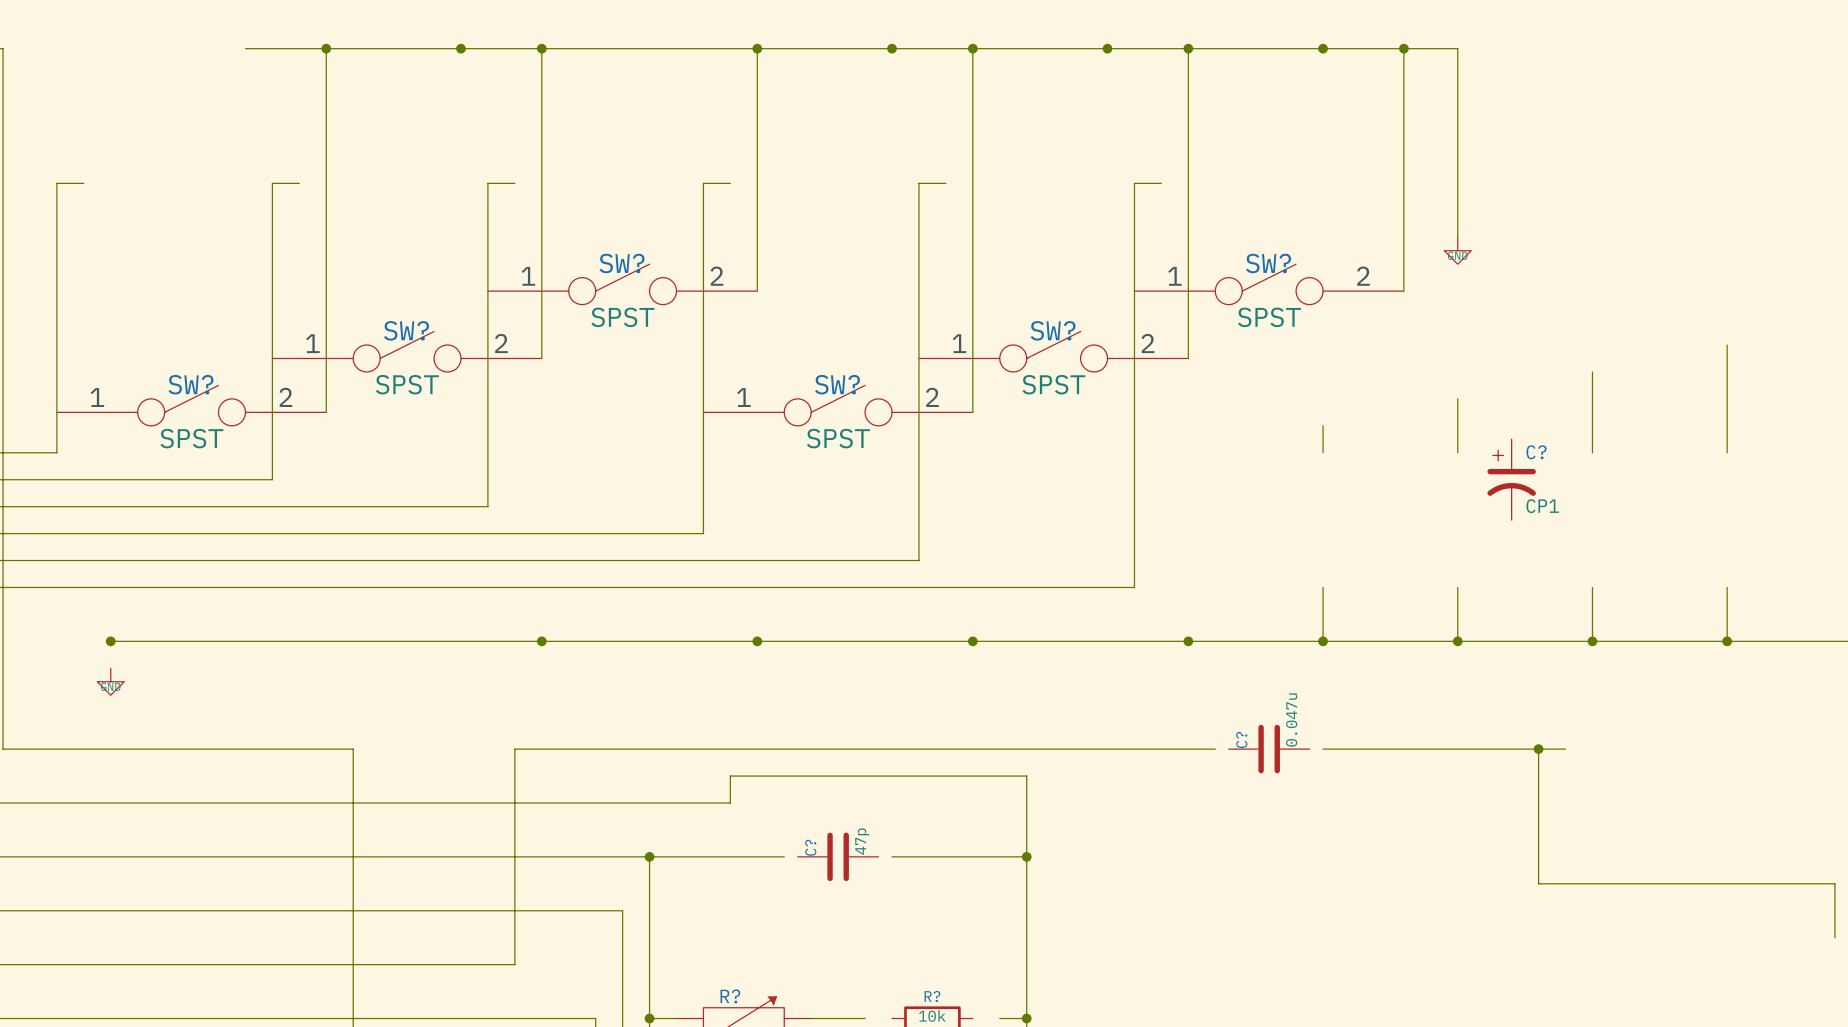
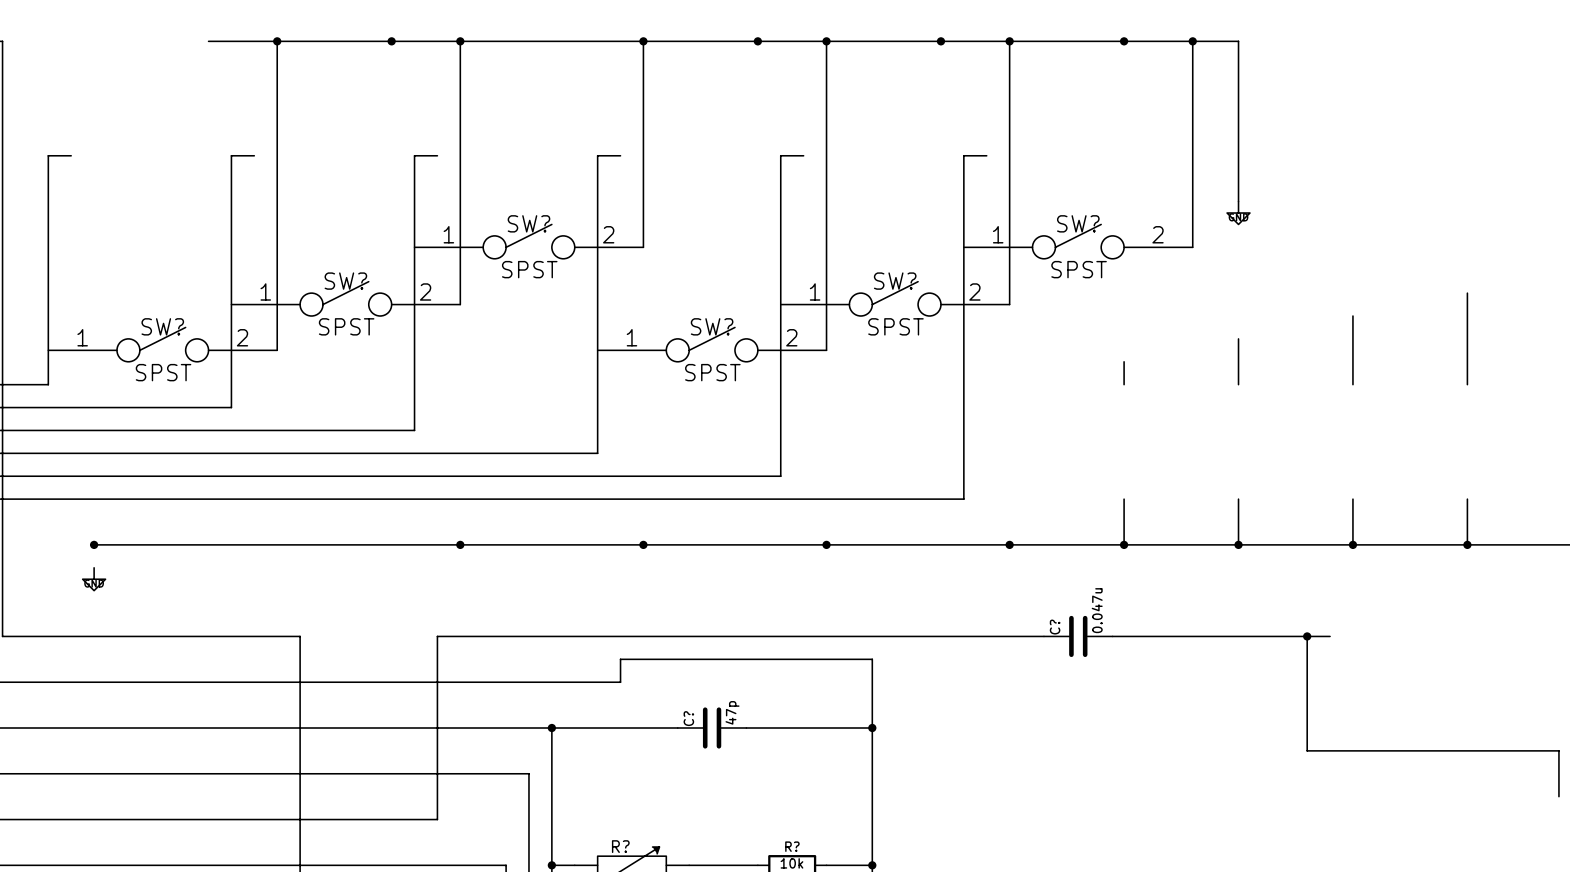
C?: CP1 (1511, 479) -> none
wire: none -> (1032, 636) (1043, 636)
wire: none -> (1112, 636) (1124, 636)
wire: none -> (666, 728) (677, 728)
wire: none -> (746, 728) (757, 728)
wire: none -> (734, 865) (757, 865)
wire: none -> (826, 865) (849, 865)

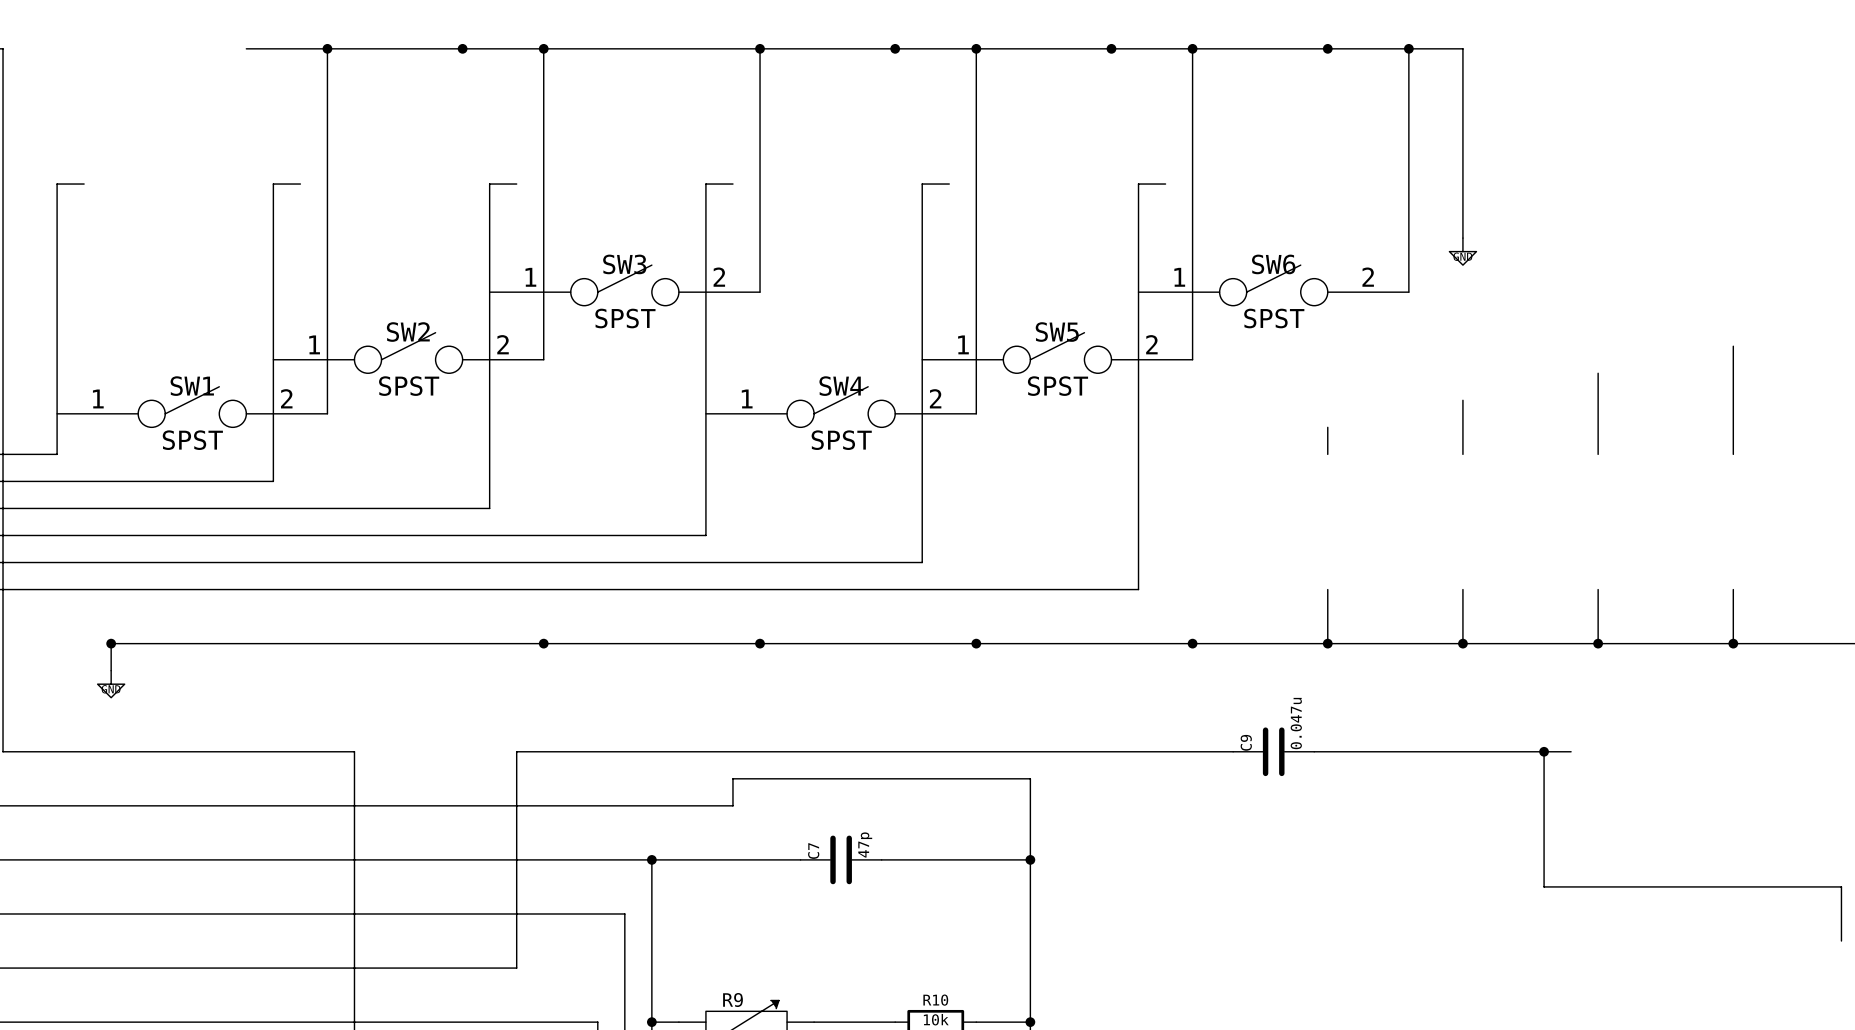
SW? name: SW? (528, 223) -> SW3 (624, 264)
SW? name: SW? (1078, 223) -> SW6 (1273, 264)
SW? name: SW? (345, 281) -> SW2 (408, 332)
SW? name: SW? (895, 281) -> SW5 (1057, 332)
SW? name: SW? (162, 326) -> SW1 (192, 386)
SW? name: SW? (712, 326) -> SW4 (841, 386)
wire: none -> (111, 643) (111, 670)
C? name: C? (1055, 627) -> C9 (1246, 742)
C? name: C? (688, 718) -> C7 (813, 851)
R? name: R? (620, 846) -> R9 (733, 1000)
R? name: R? (792, 846) -> R10 (935, 1000)

